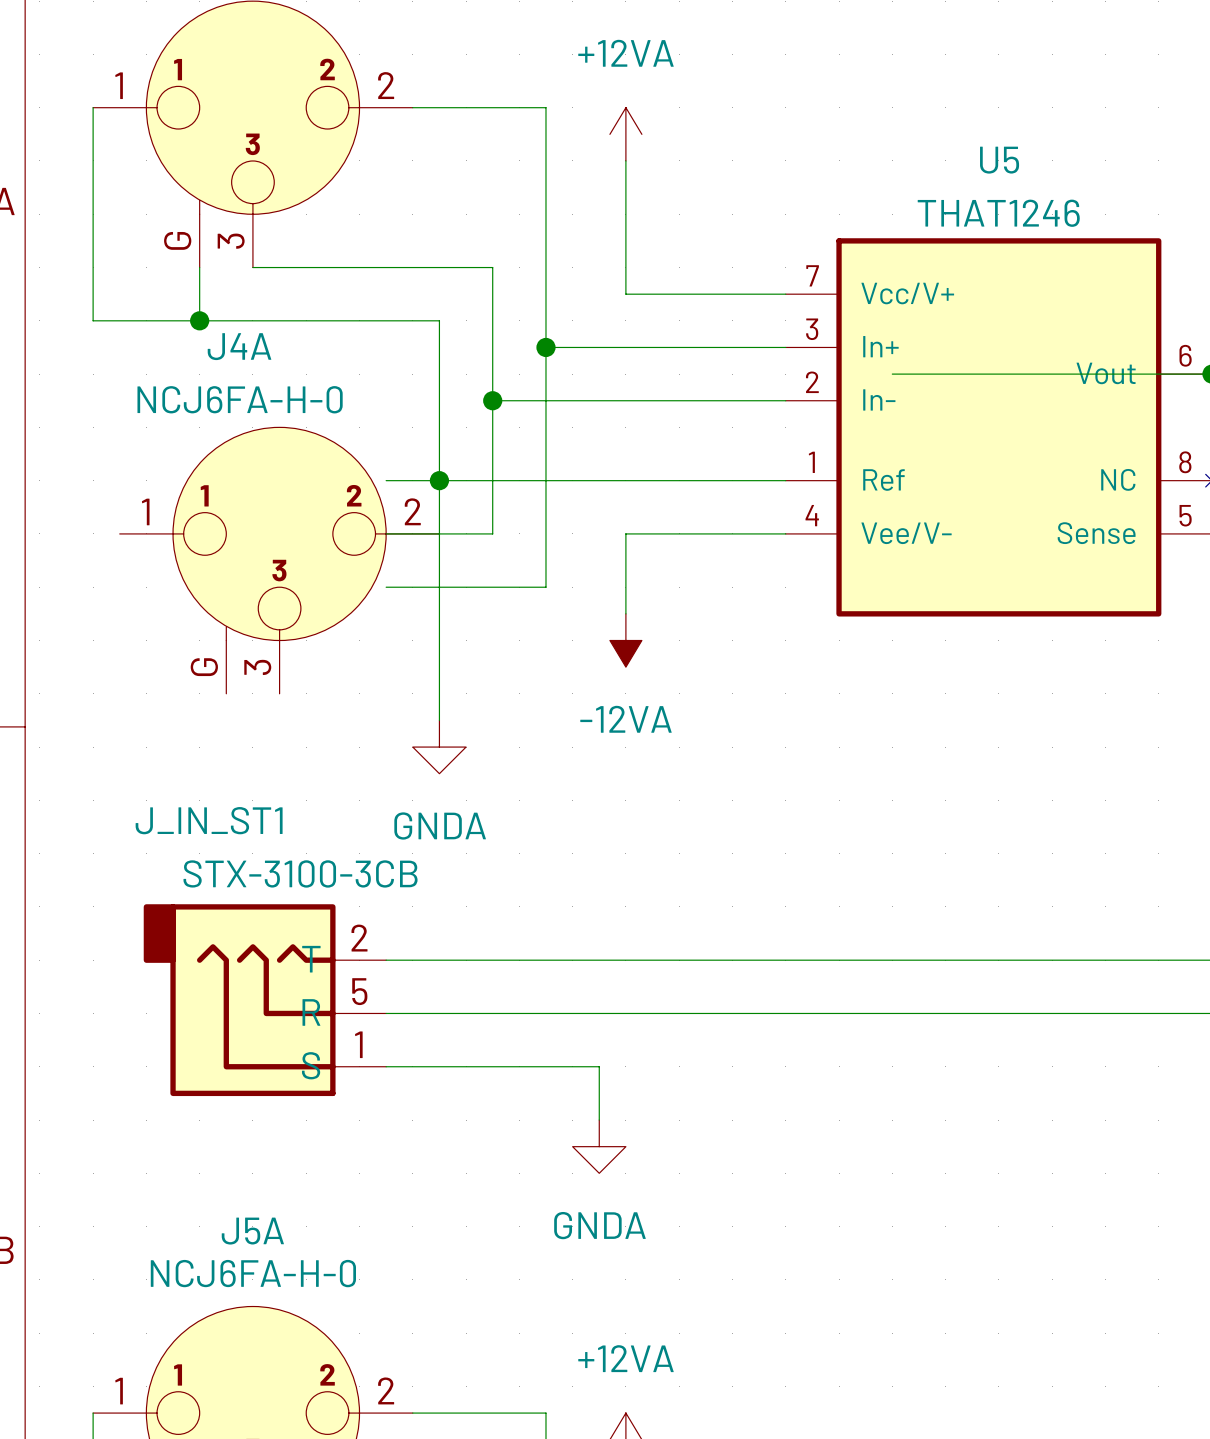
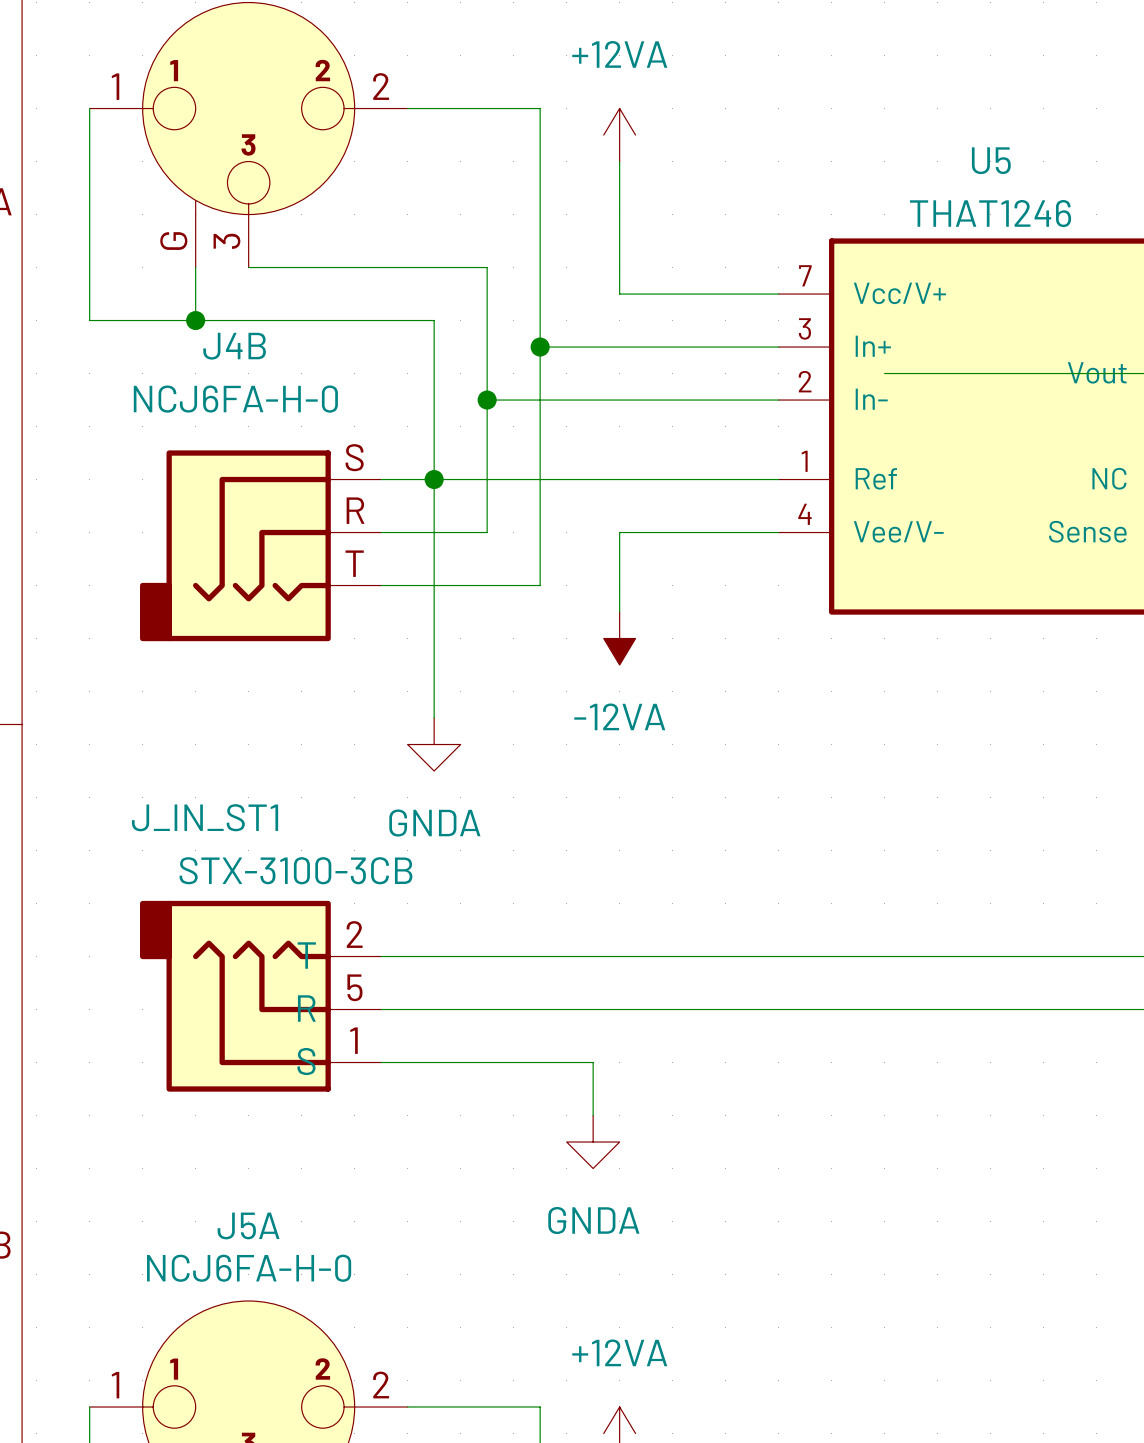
J4B: none -> NCJ6FA-H-0 (260, 545)
J4A: NCJ6FA-H-0 (279, 560) -> none

